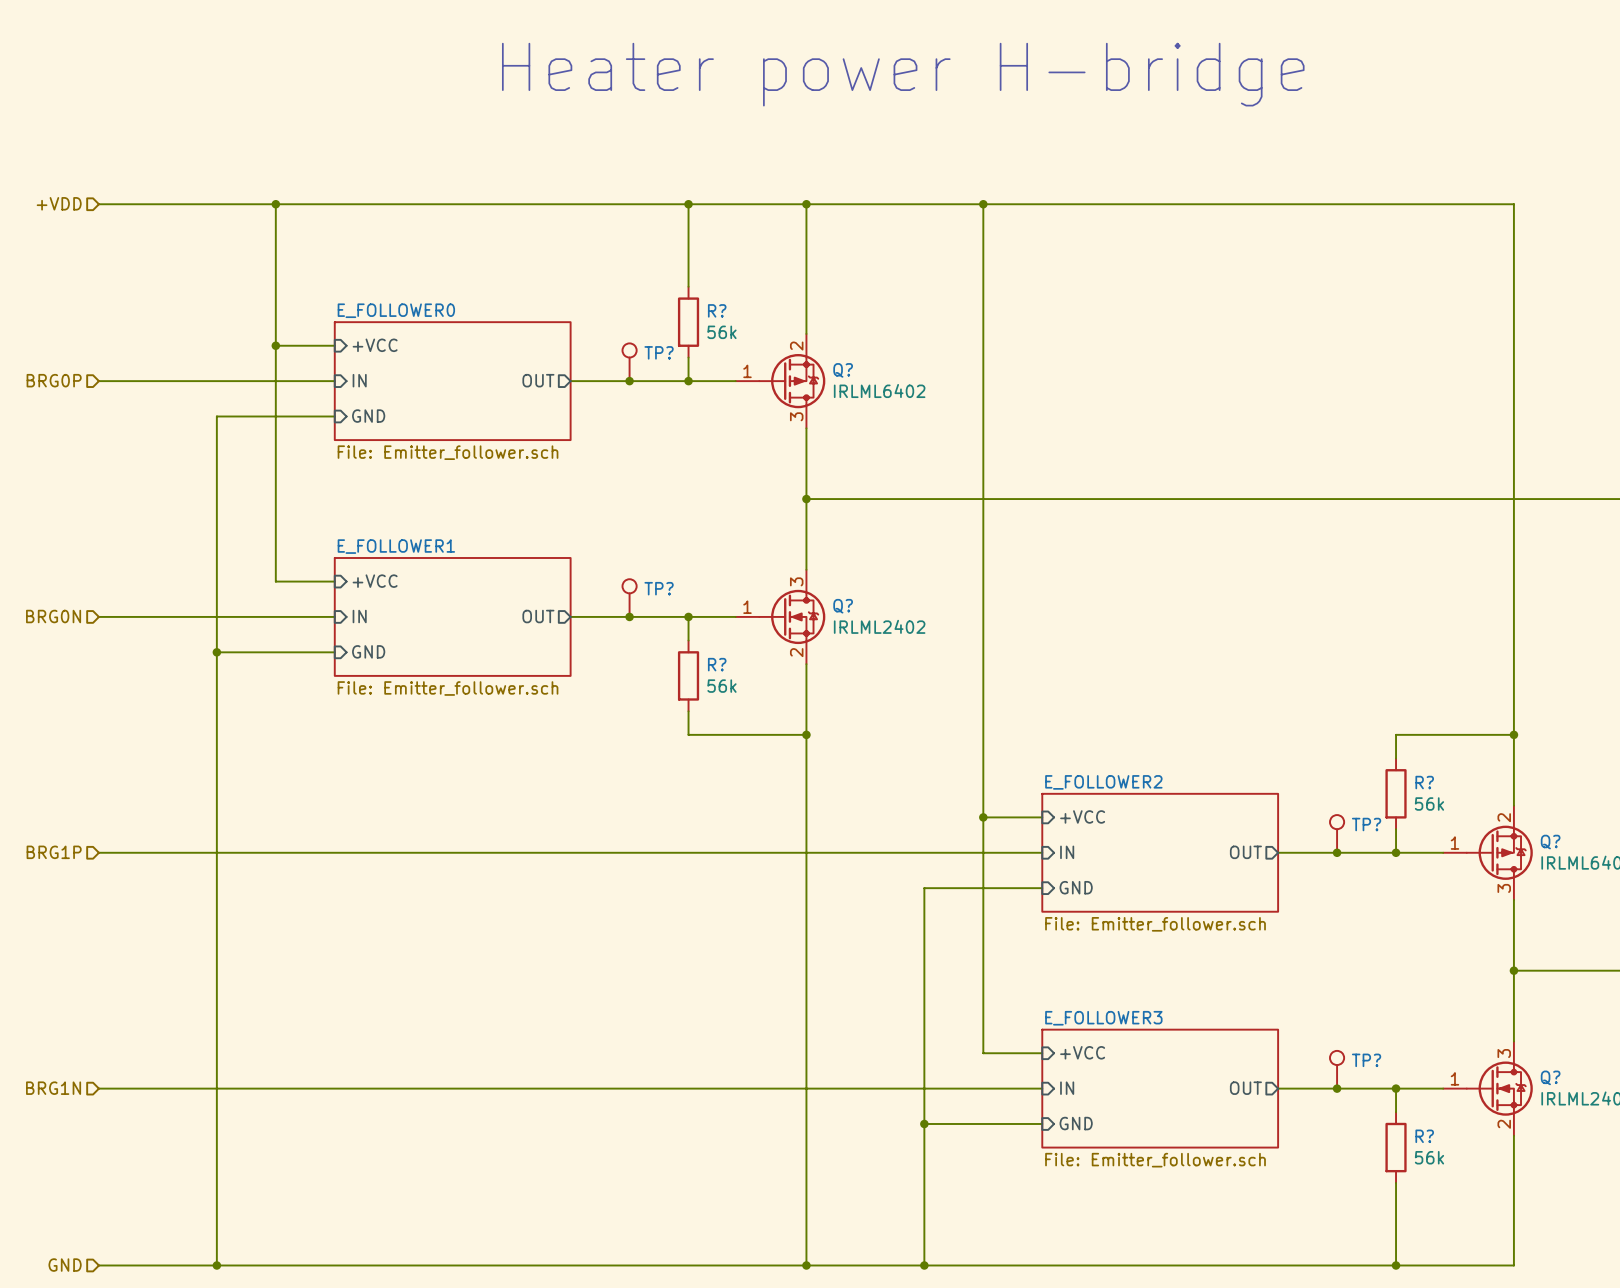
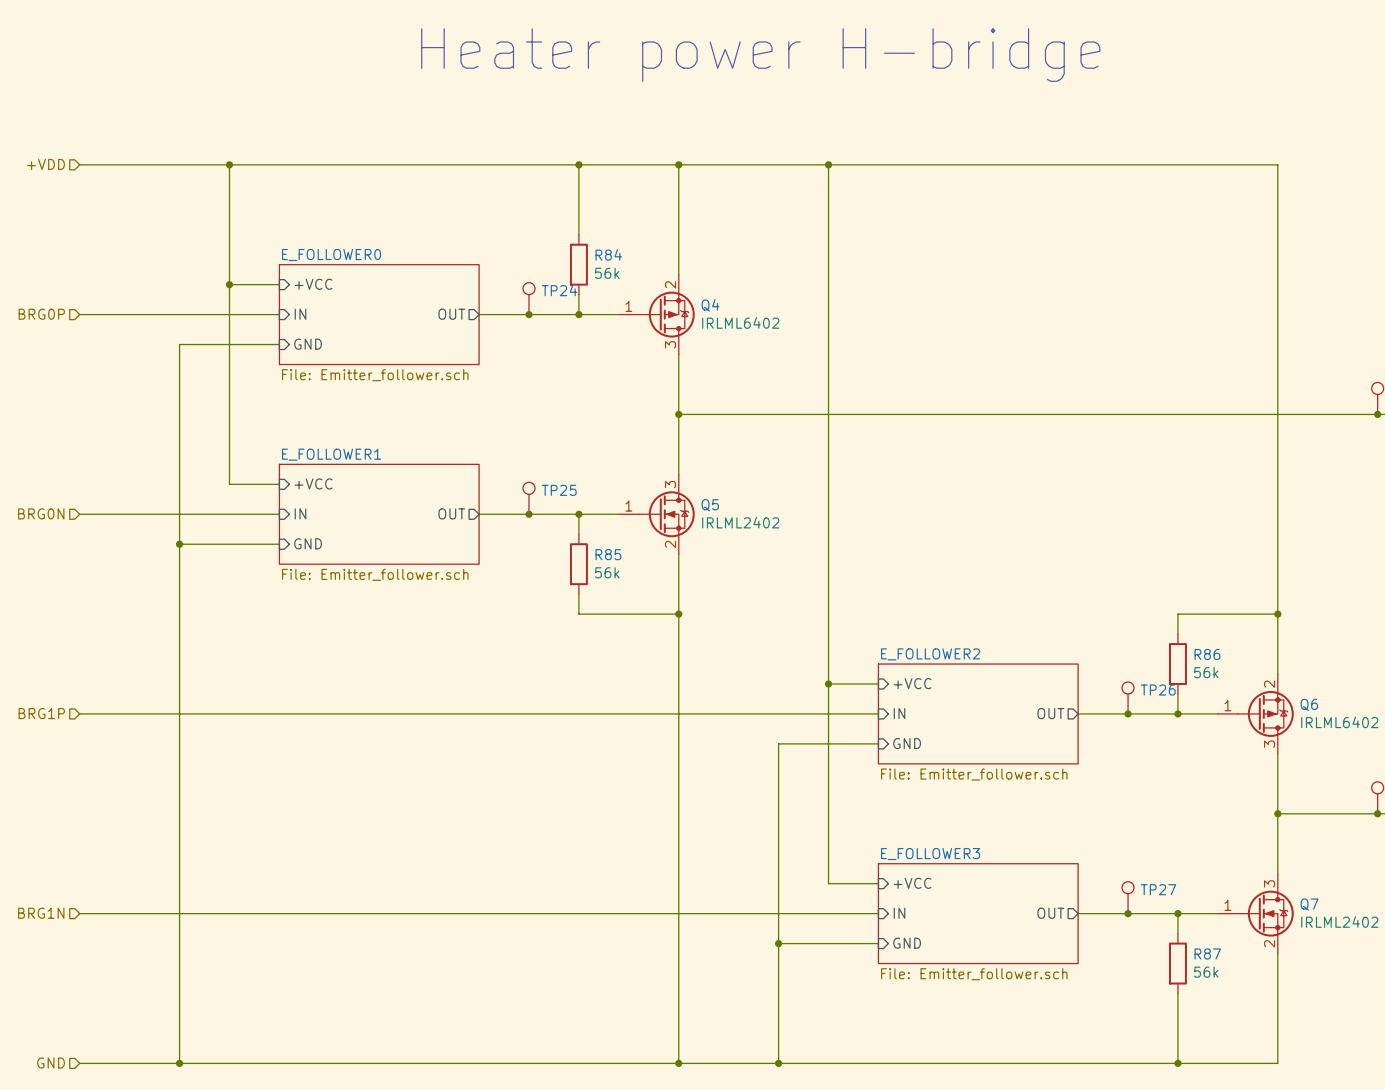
R? name: R? (717, 310) -> R84 (608, 254)
TP? name: TP? (659, 352) -> TP24 (559, 290)
Q? name: Q? (843, 370) -> Q4 (710, 305)
TP? name: TP? (659, 588) -> TP25 (559, 490)
Q? name: Q? (843, 606) -> Q5 (710, 505)
R? name: R? (717, 664) -> R85 (608, 554)
R? name: R? (1424, 782) -> R86 (1207, 654)
TP? name: TP? (1366, 824) -> TP26 (1158, 690)
Q? name: Q? (1550, 842) -> Q6 (1309, 704)
TP? name: TP? (1366, 1060) -> TP27 (1158, 889)
Q? name: Q? (1550, 1077) -> Q7 (1309, 904)
R? name: R? (1424, 1136) -> R87 (1207, 953)

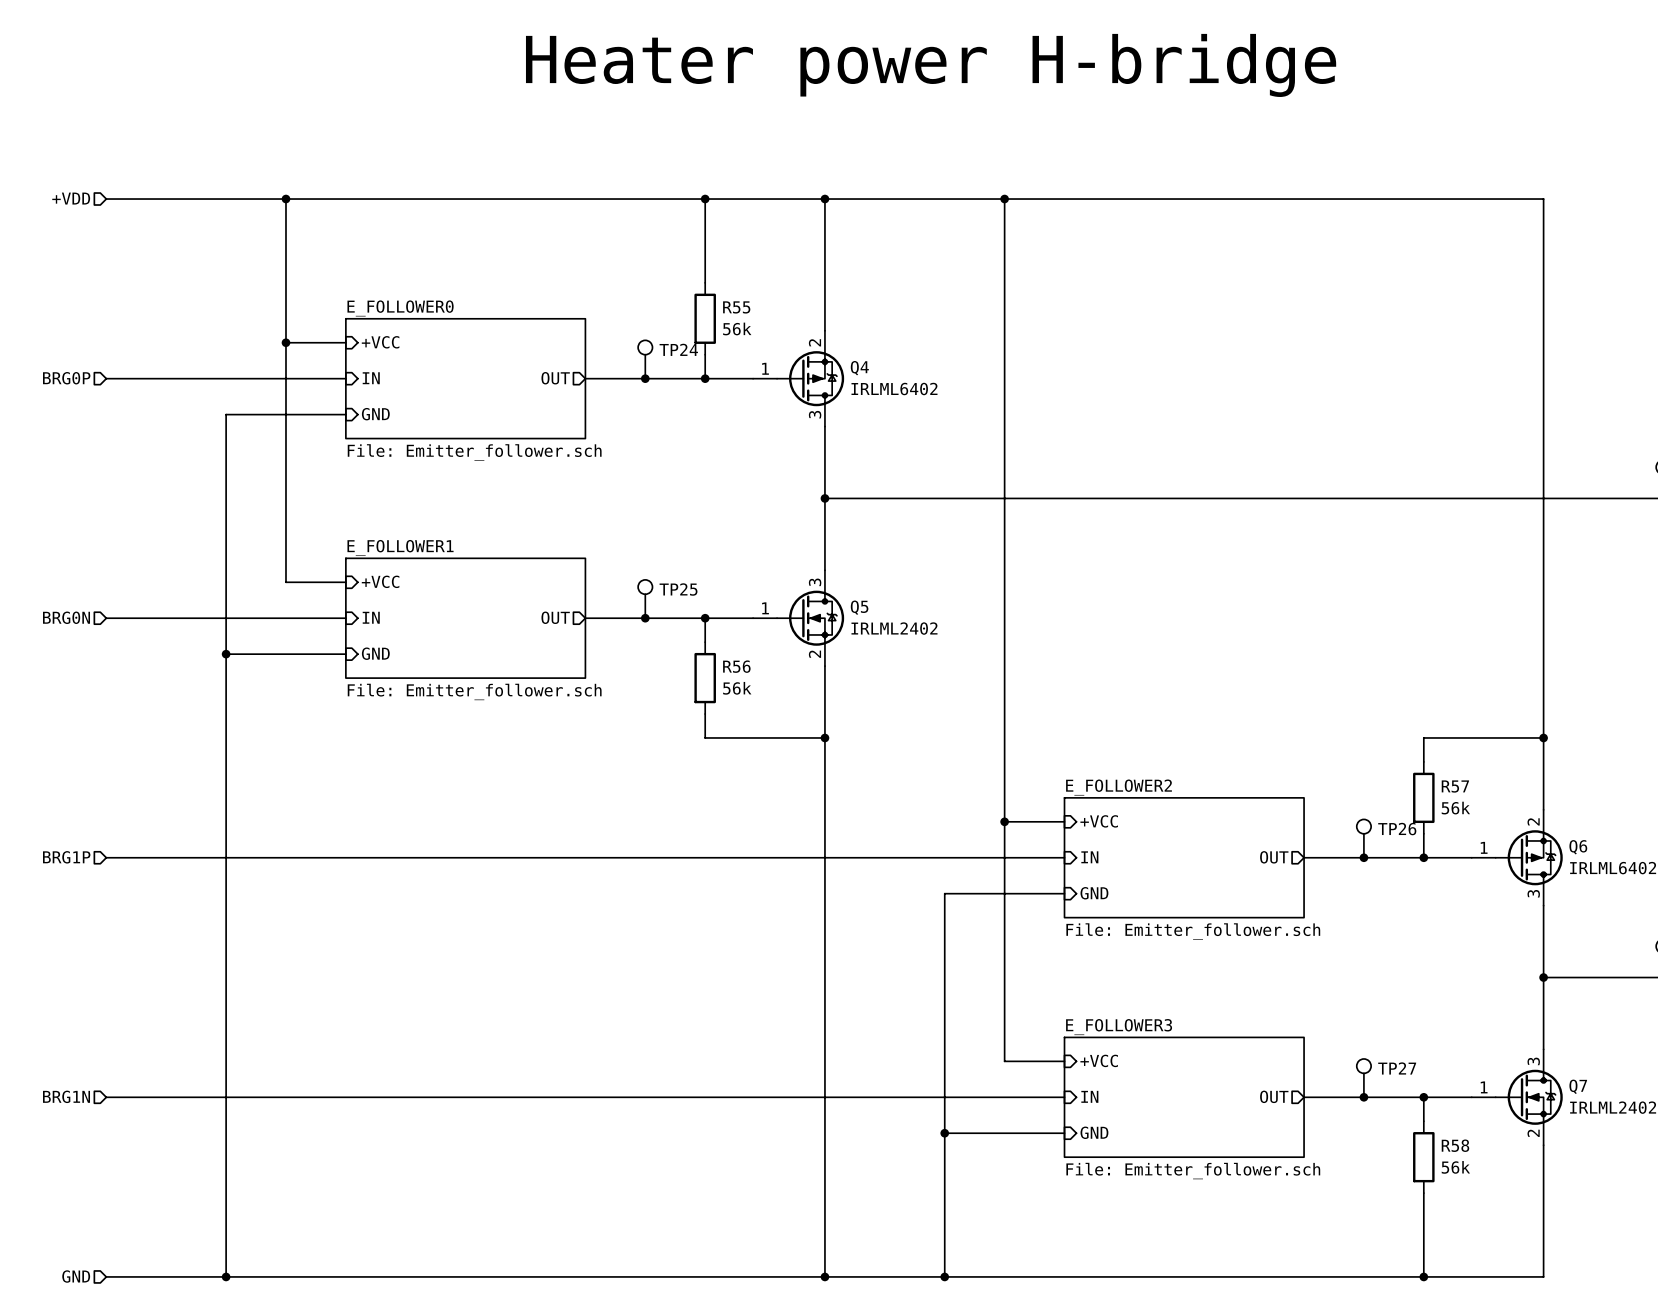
R84 name: R84 (608, 254) -> R55 (736, 307)
R85 name: R85 (608, 554) -> R56 (736, 666)
R86 name: R86 (1207, 654) -> R57 (1455, 786)
R87 name: R87 (1207, 953) -> R58 (1455, 1145)

